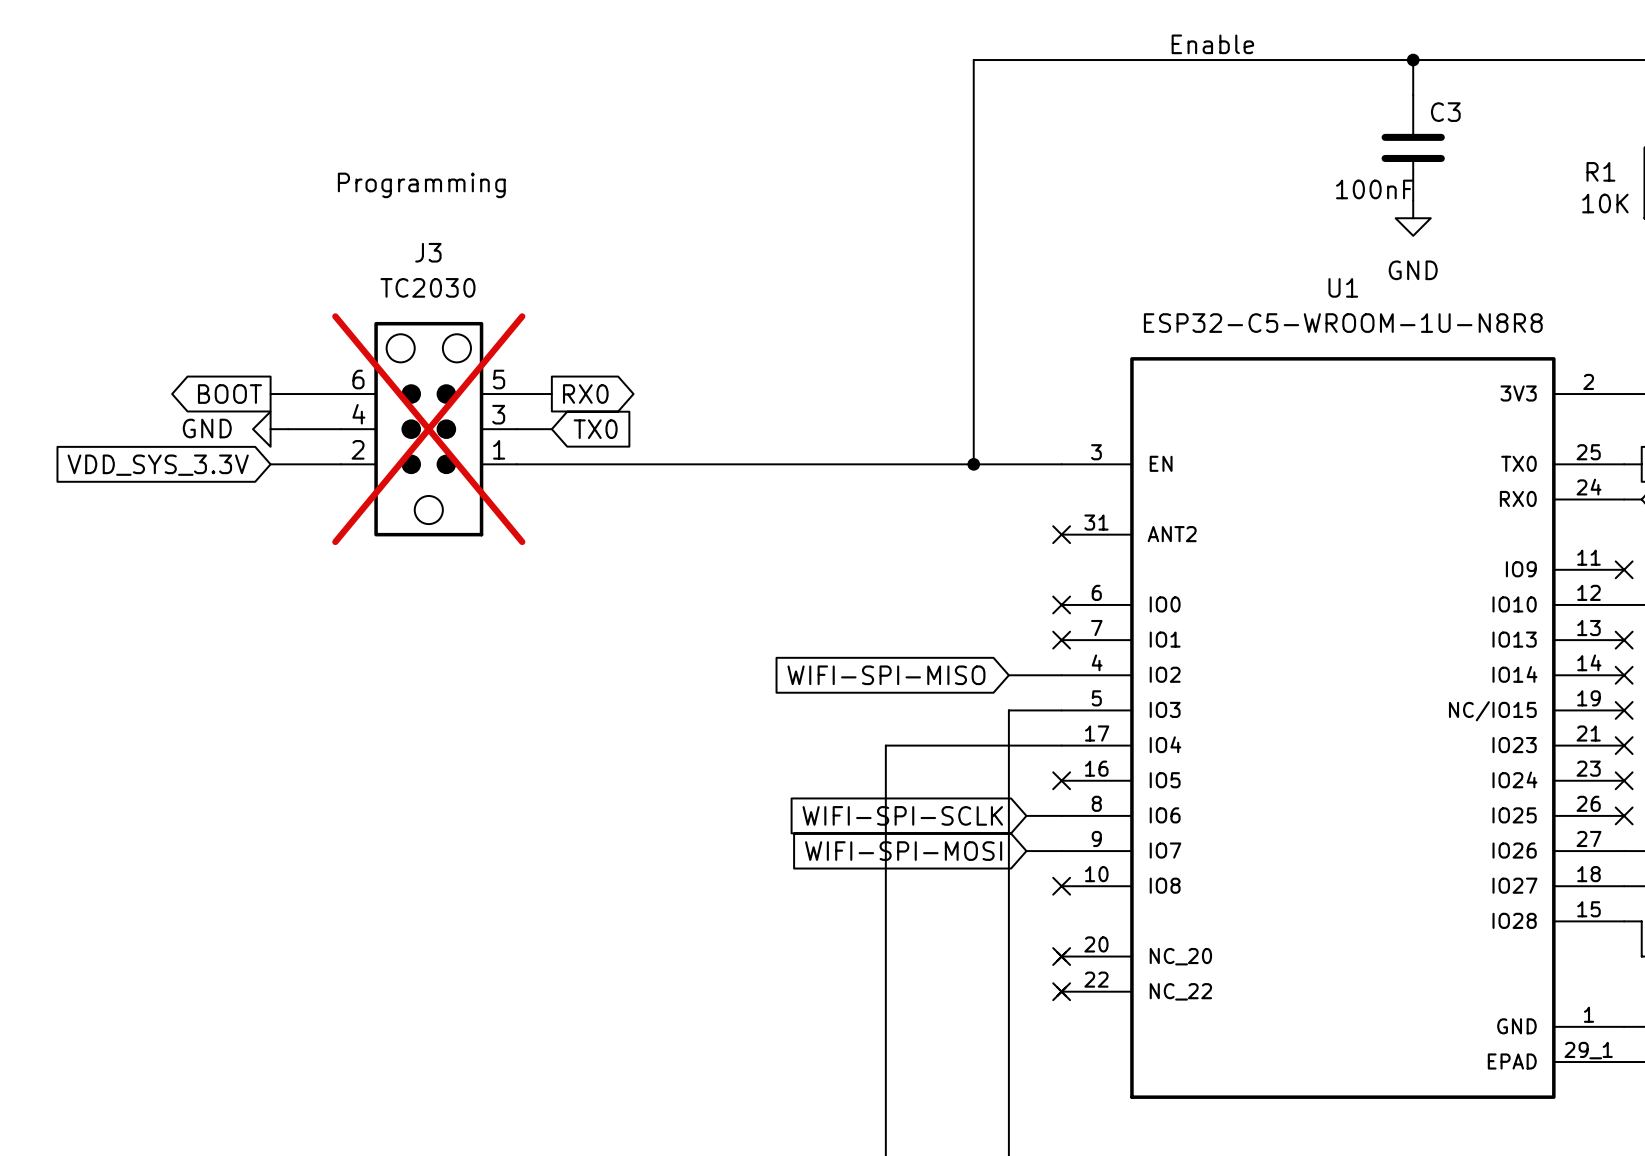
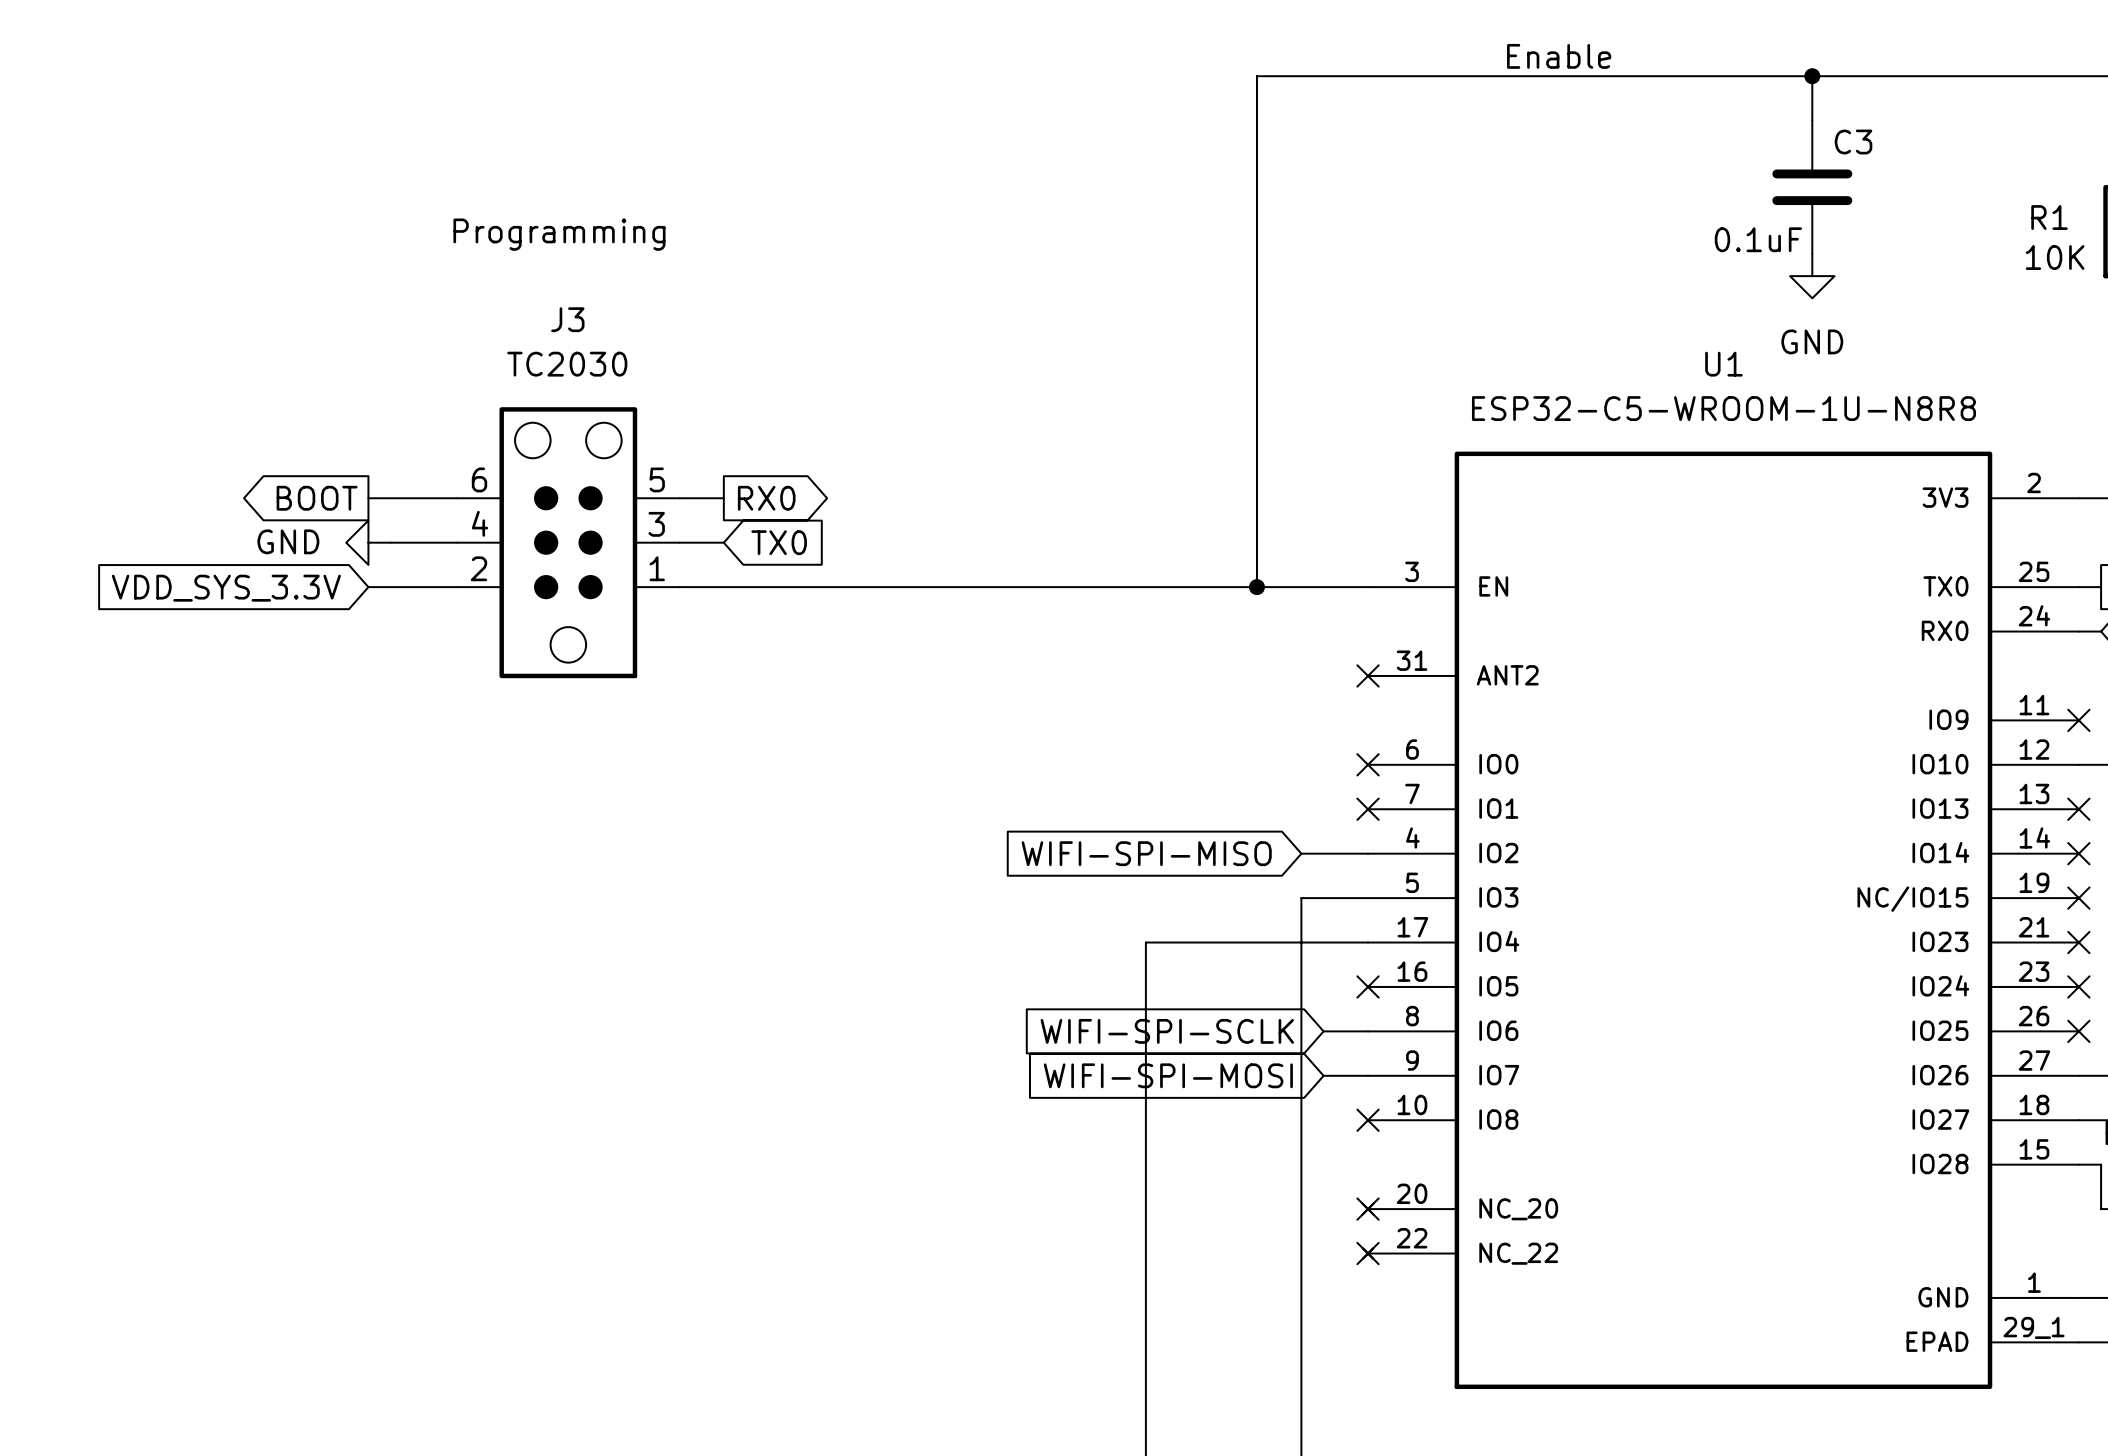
C3 value: 100nF (1374, 189) -> 0.1uF (1758, 239)
J3 do-not-place cross: (428, 429) -> none

